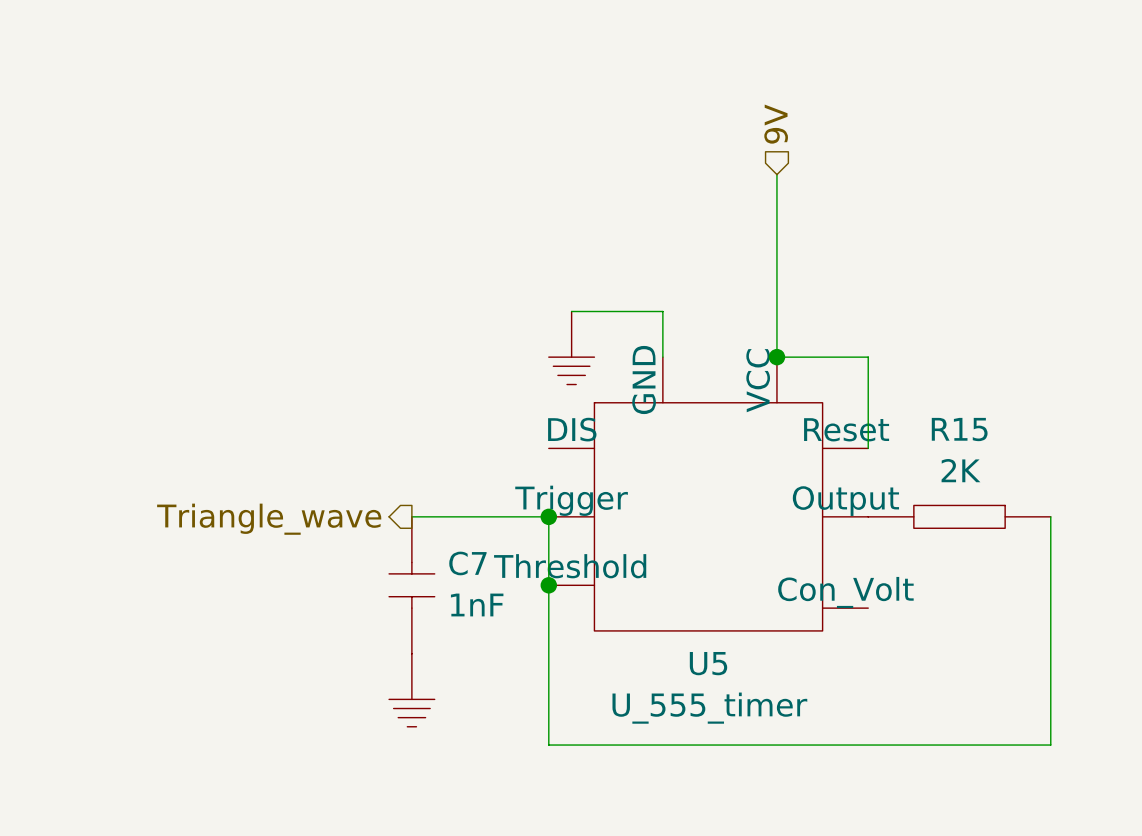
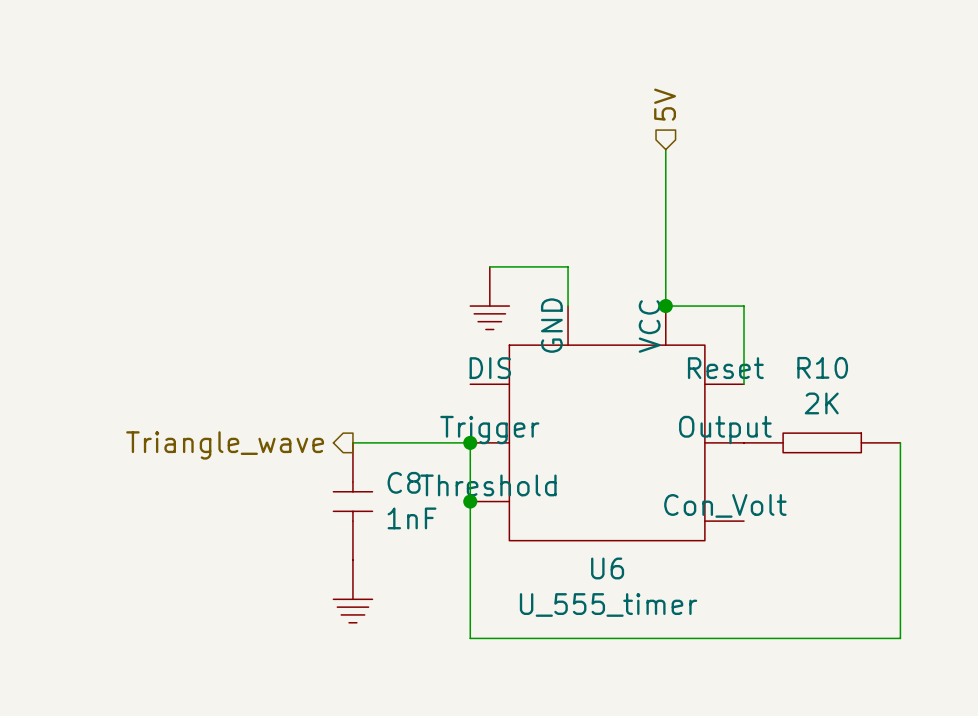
hierarchical label: 9V (776, 124) -> 5V (665, 104)
R15 name: R15 (959, 429) -> R10 (822, 367)
C7 name: C7 (467, 563) -> C8 (404, 482)
U5 name: U5 (708, 663) -> U6 (607, 568)

